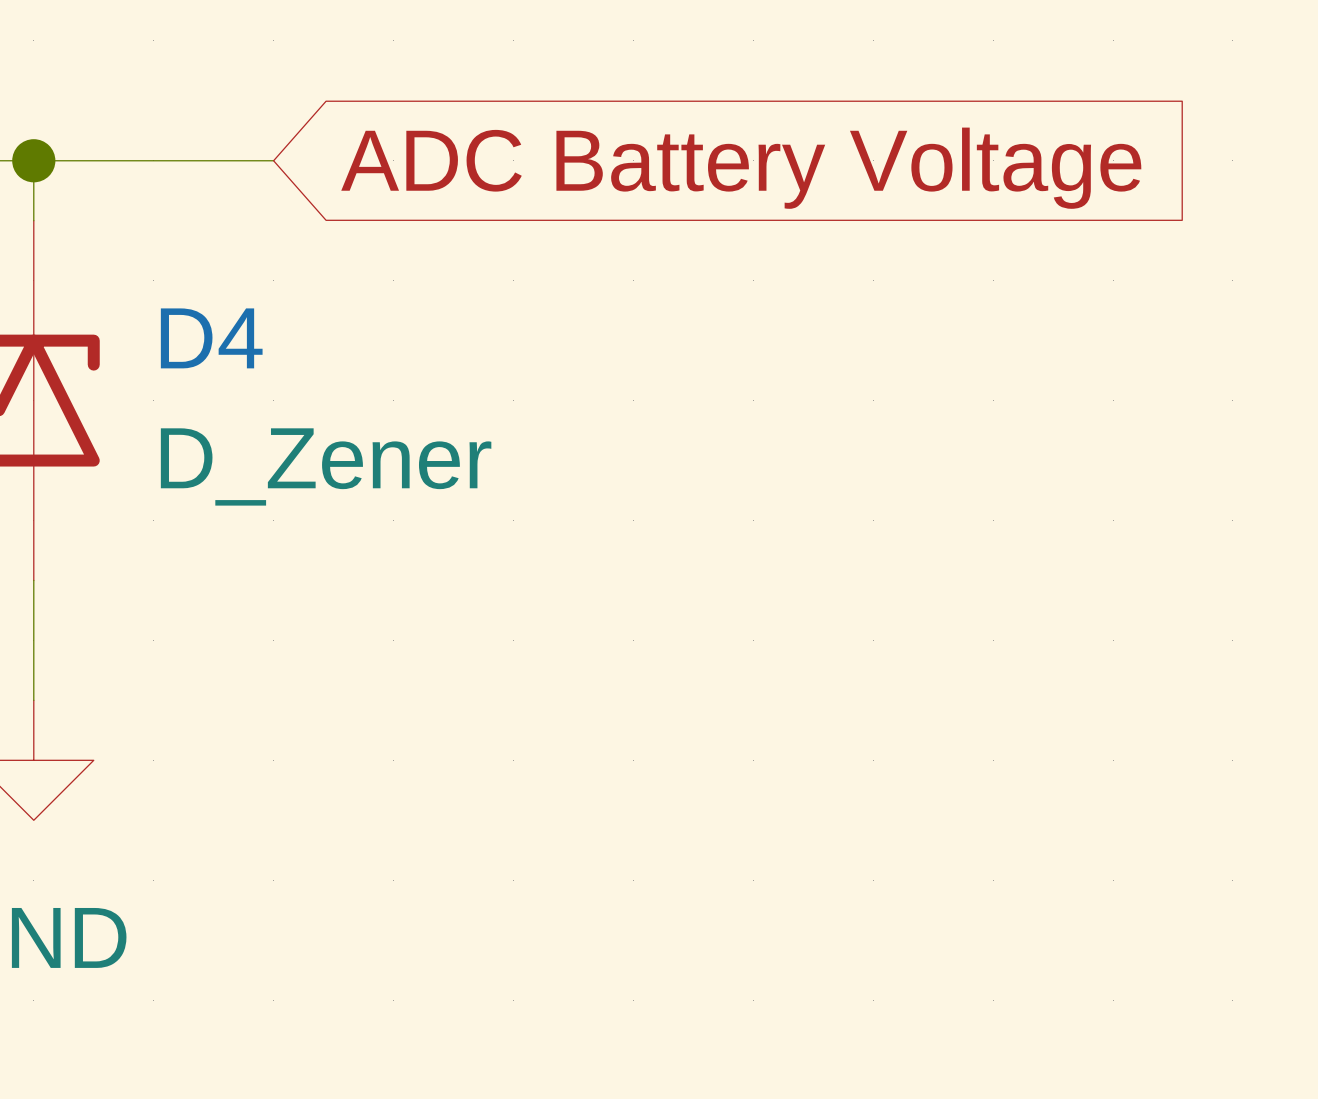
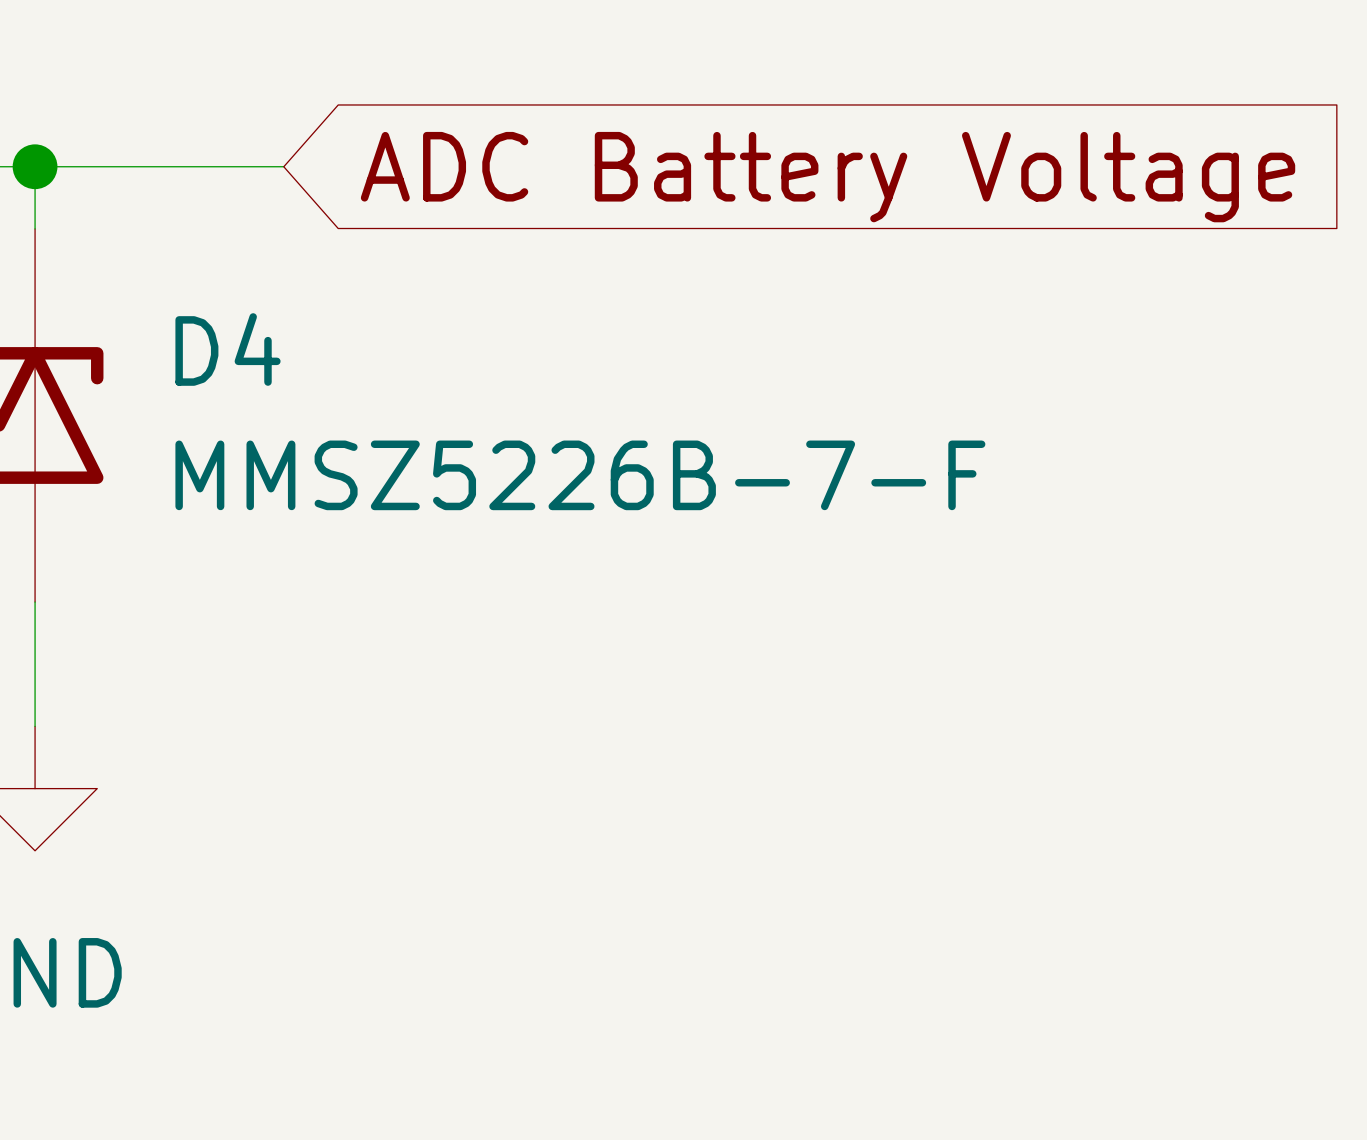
D4 value: D_Zener (326, 466) -> MMSZ5226B-7-F (580, 475)

